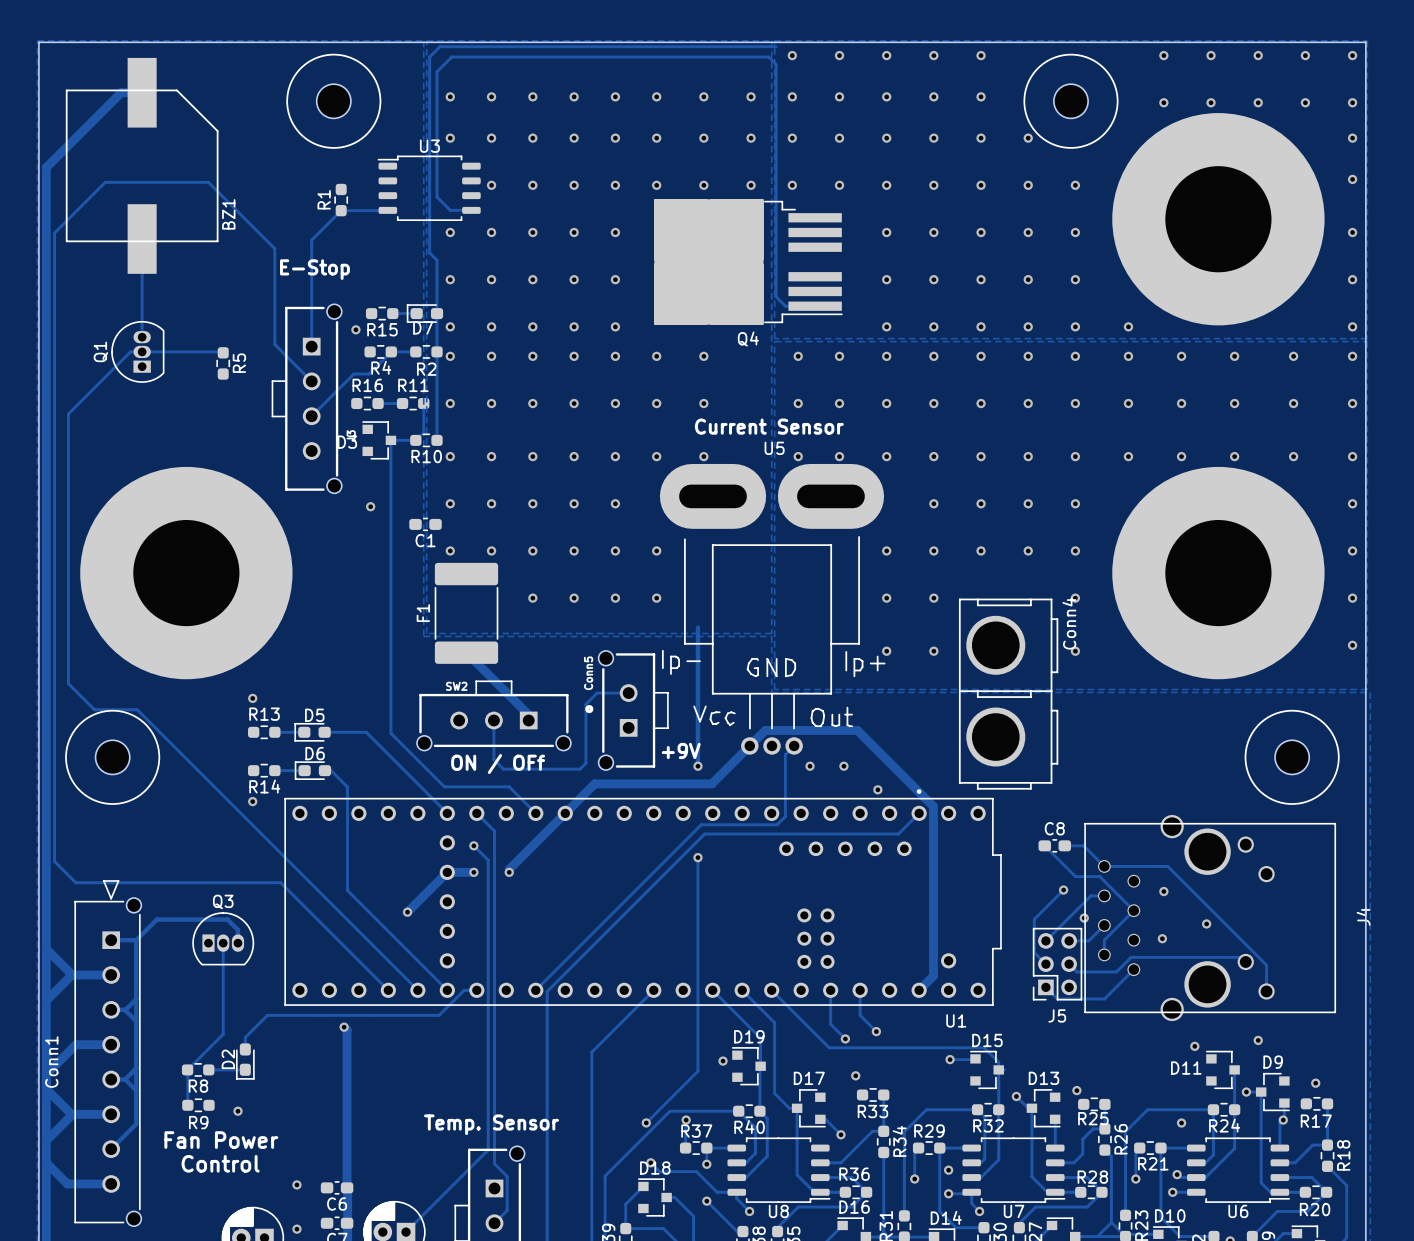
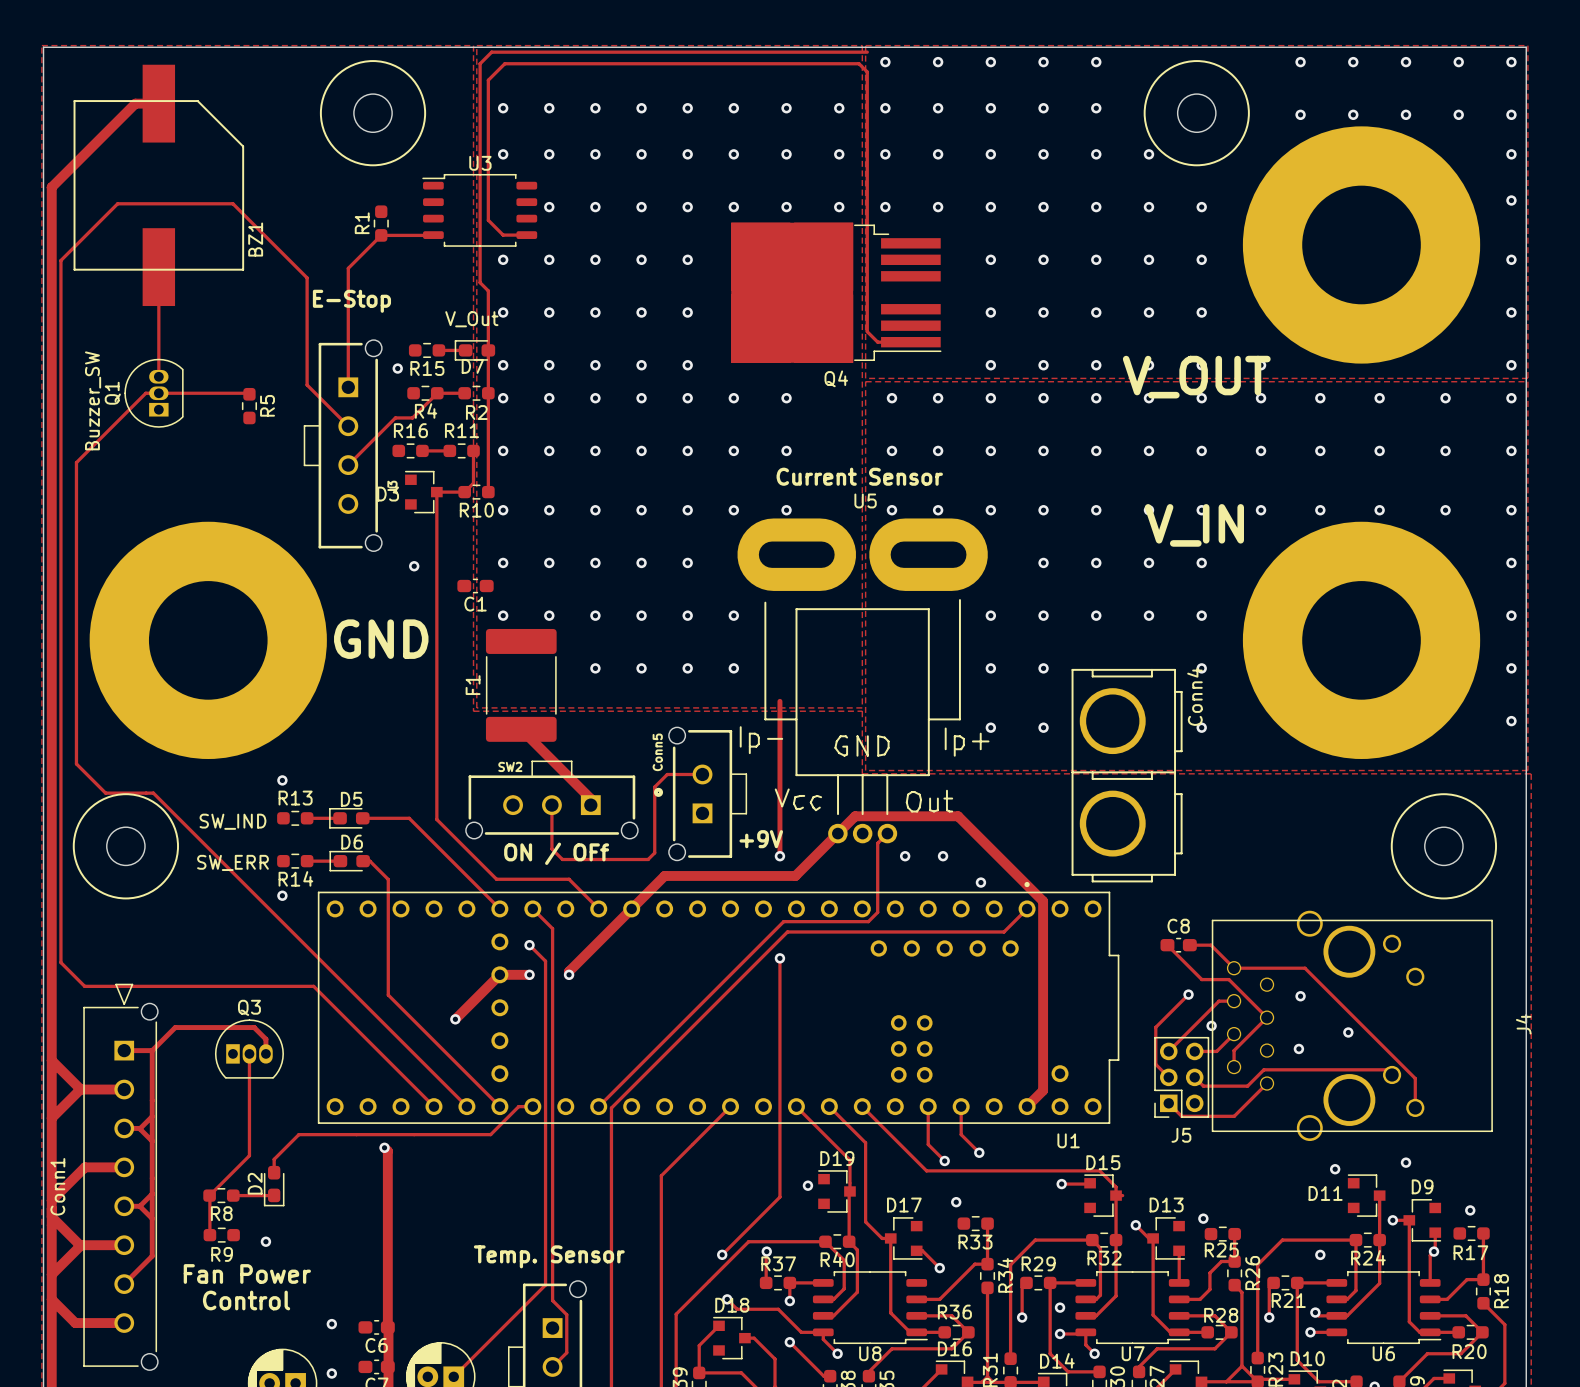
text: none -> V_Out (471, 319)
text: none -> V_OUT (1196, 377)
text: none -> Buzzer_SW (93, 400)
text: none -> V_IN (1194, 525)
text: none -> GND (381, 639)
text: none -> SW_IND (232, 821)
text: none -> SW_ERR (232, 862)

